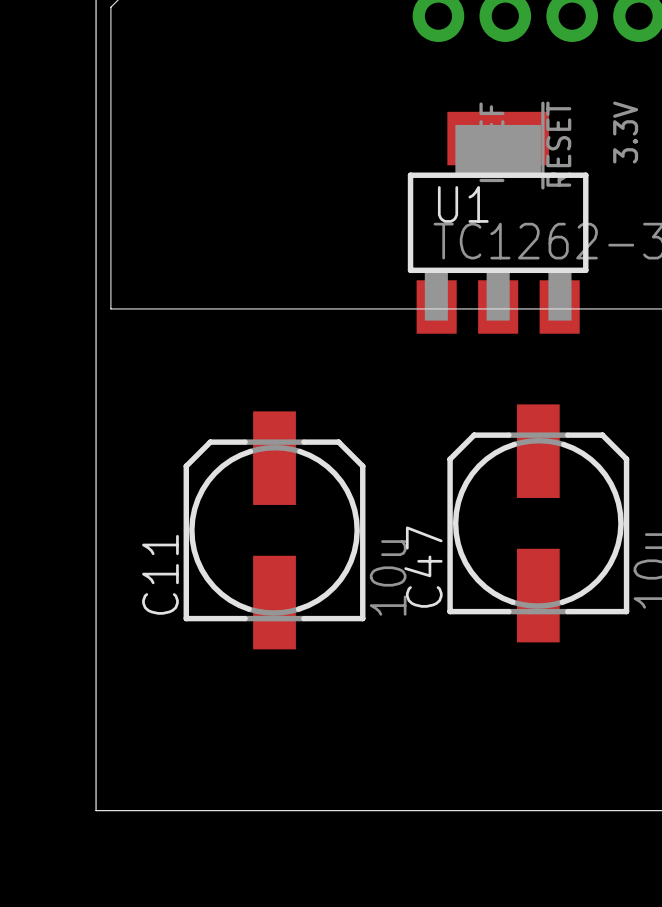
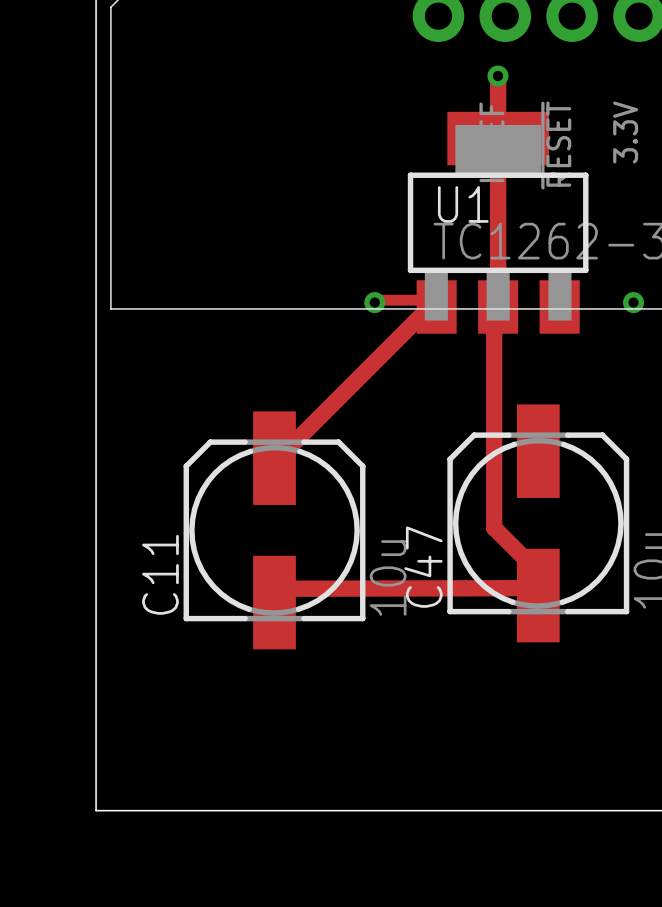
via: none -> (497, 76)
track: none -> (498, 76) (498, 300) (494, 304) (494, 527) (538, 572) (544, 588) (281, 588) (274, 595)
track: none -> (374, 302) (377, 300) (436, 300) (285, 451) (274, 451)
via: none -> (374, 302)
via: none -> (633, 302)

